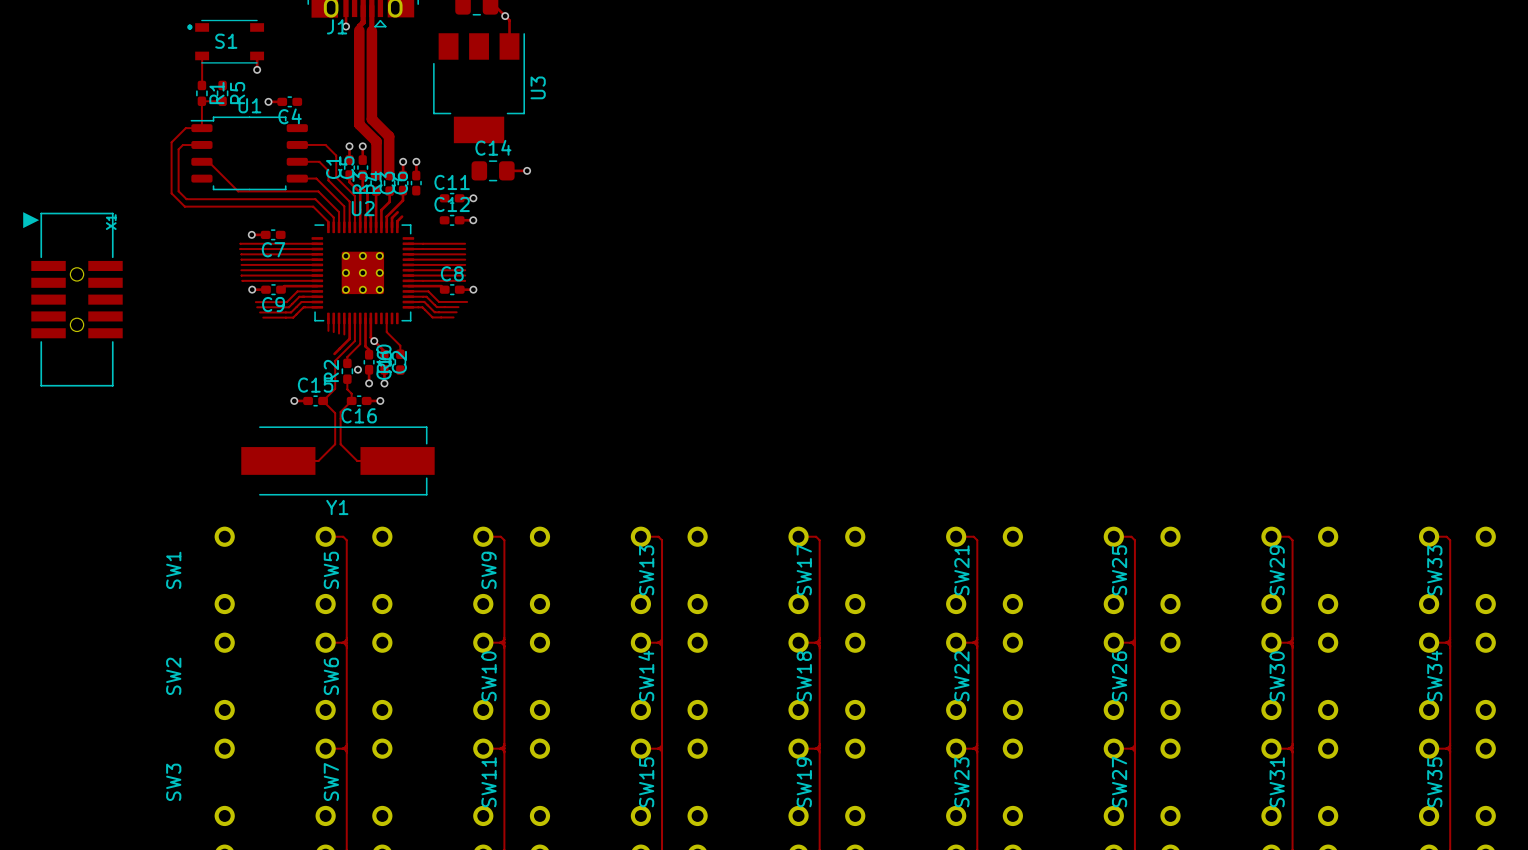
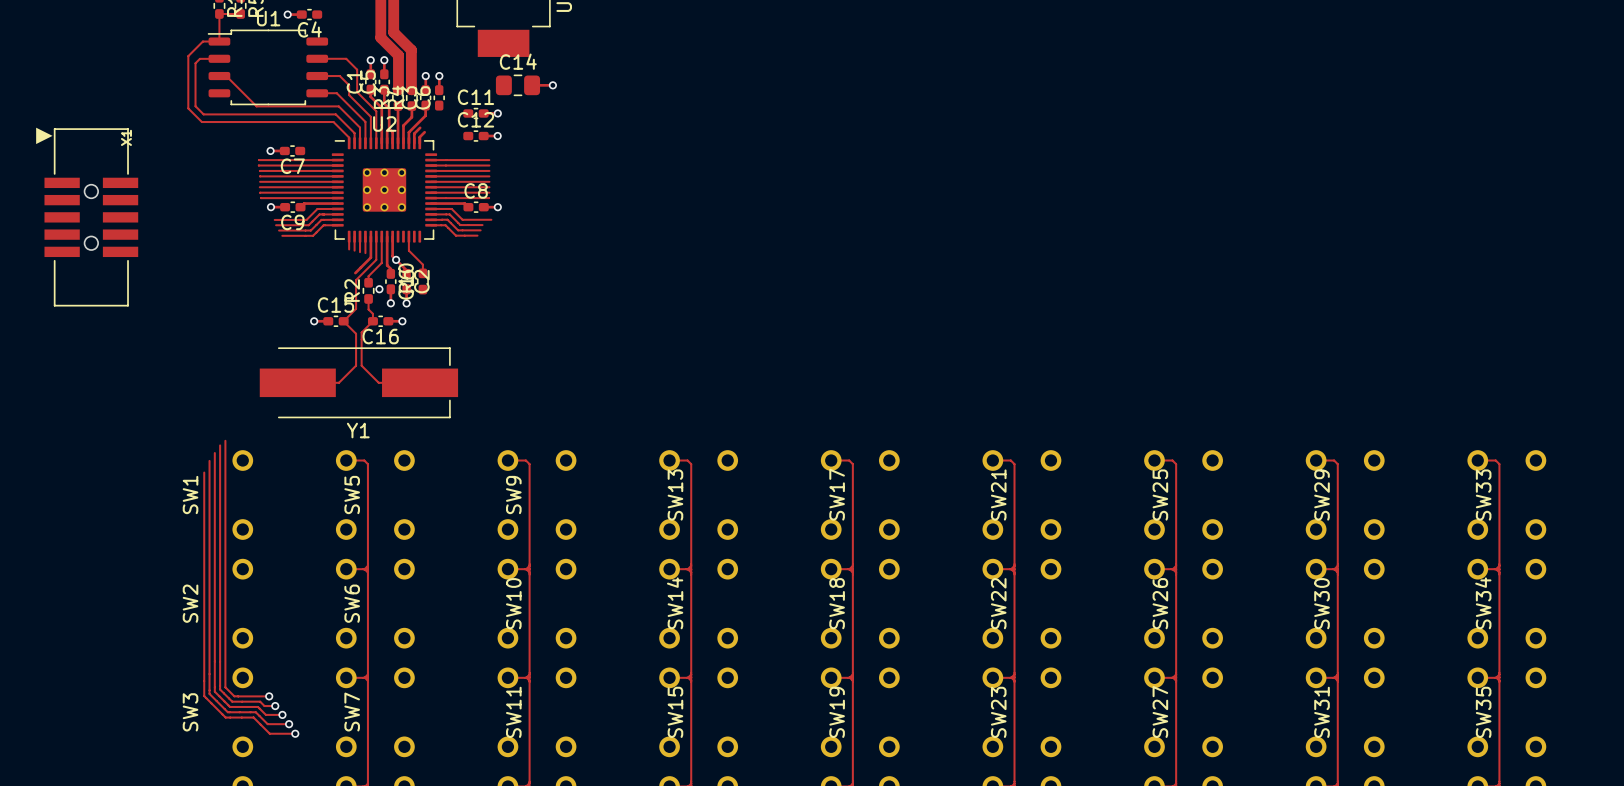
track: none -> (225, 440) (225, 687) (234, 696) (238, 696)
track: none -> (220, 445) (220, 689) (232, 701) (260, 701) (264, 706) (275, 706)
track: none -> (214, 453) (214, 691) (230, 706) (257, 706) (265, 714) (282, 714)
track: none -> (209, 460) (209, 693) (227, 712) (255, 712) (267, 724) (289, 724)
track: none -> (204, 472) (204, 696) (225, 717) (253, 717) (269, 733) (295, 733)
track: none -> (238, 696) (269, 696)
via: none -> (269, 696)
via: none -> (275, 706)
via: none -> (282, 714)
via: none -> (289, 724)
via: none -> (295, 733)

